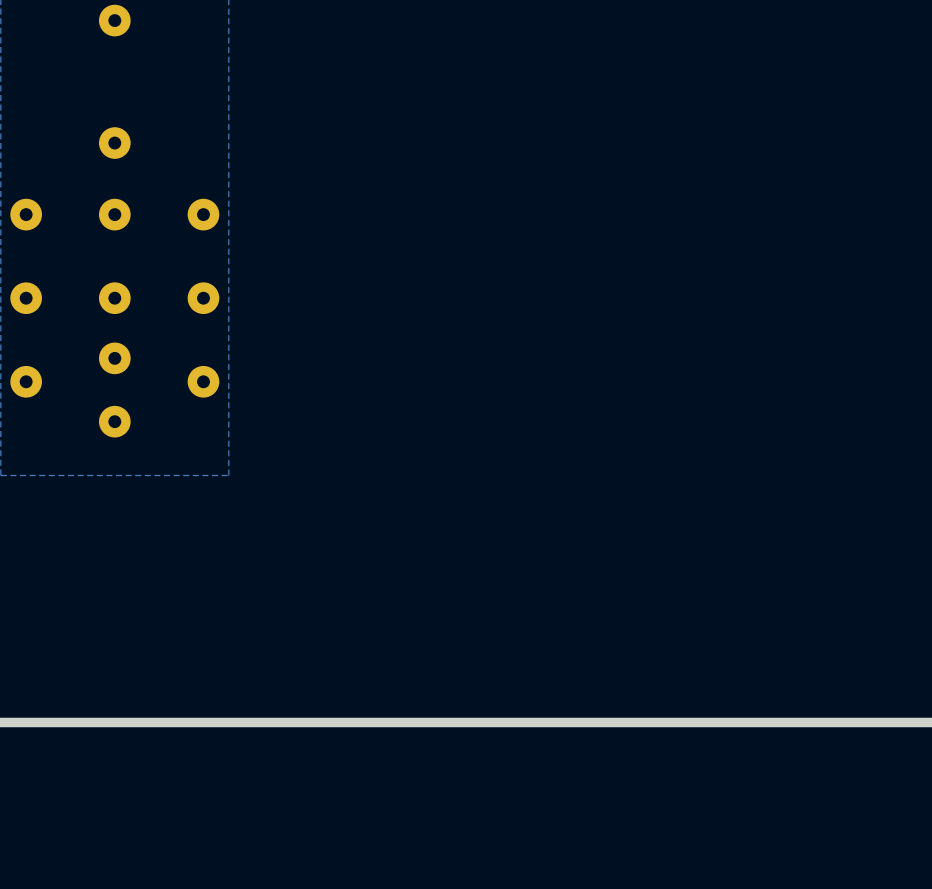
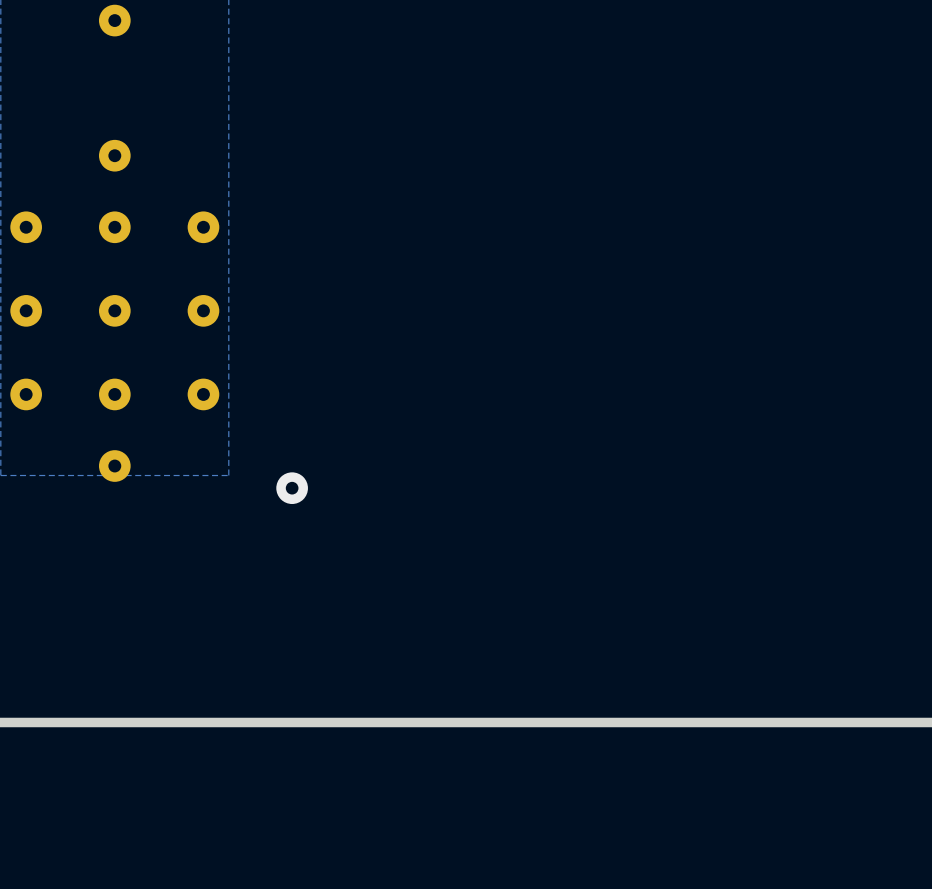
part footprint: [10, 127, 220, 438] -> [10, 139, 220, 482]
via: none -> (292, 488)

